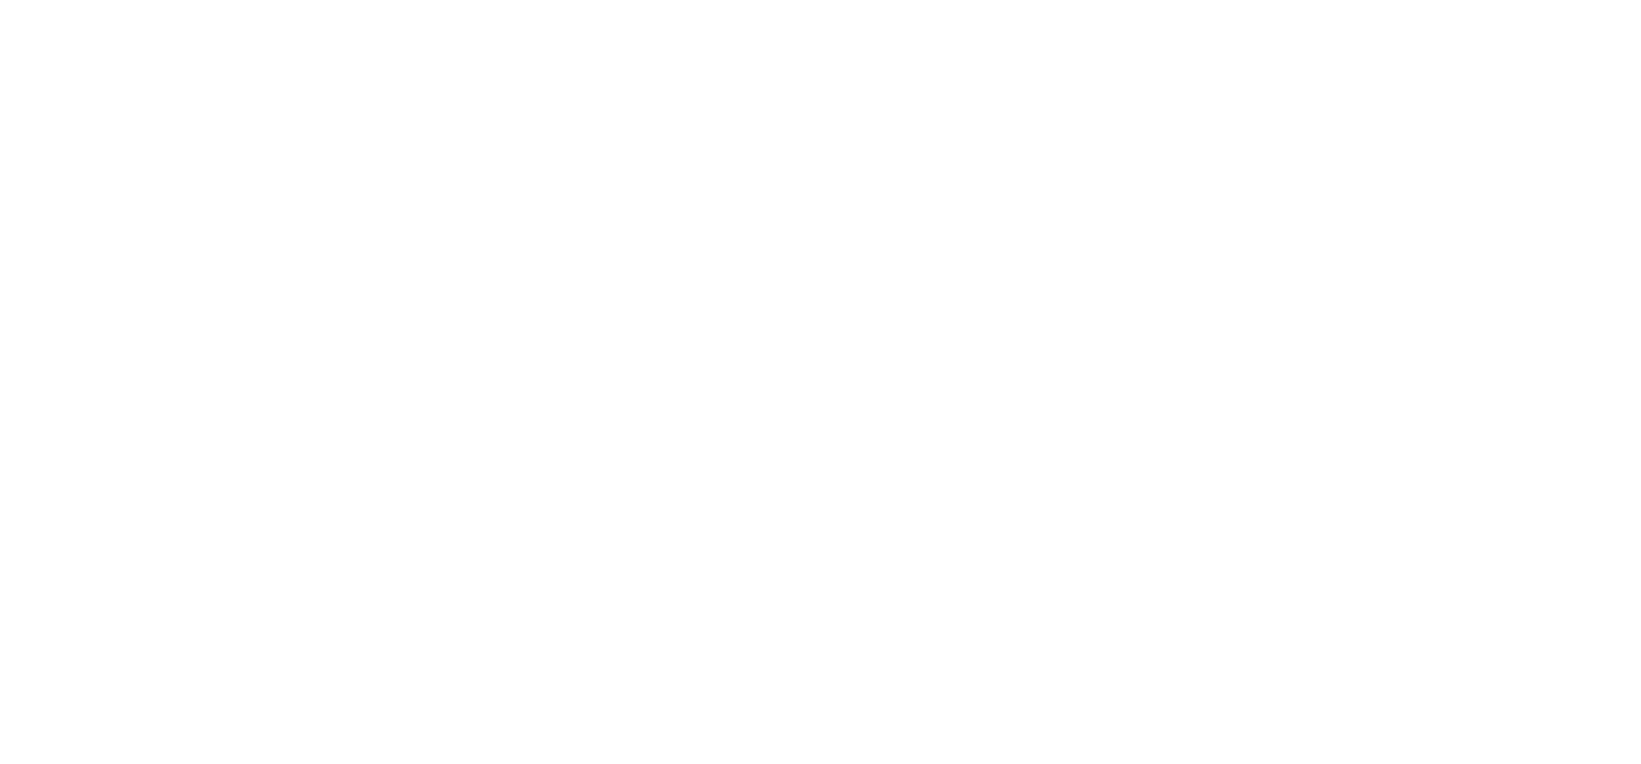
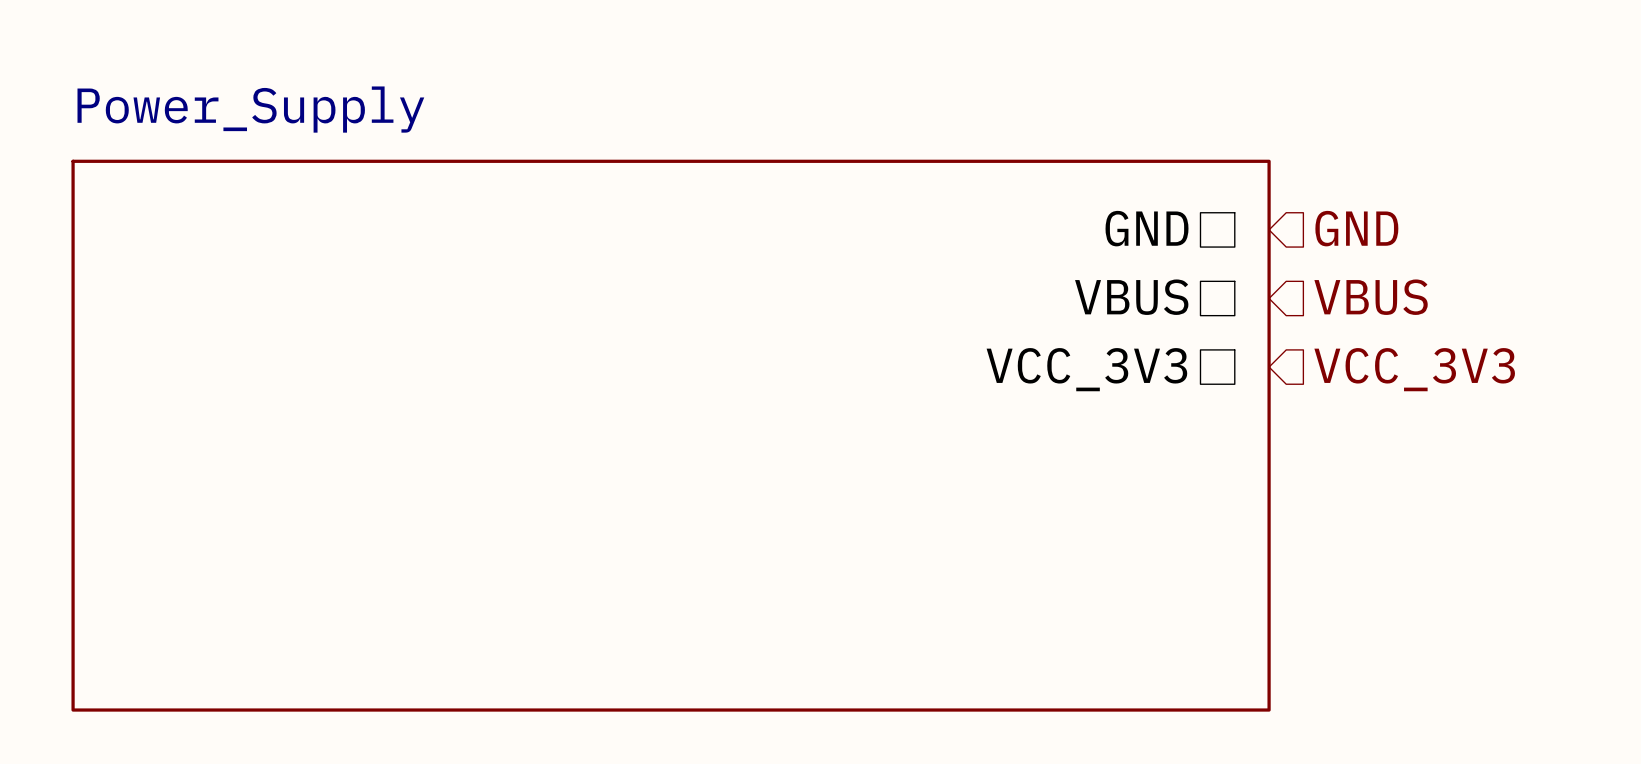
sheet pin: none -> GND (1147, 228)
hierarchical label: none -> GND (1356, 228)
sheet pin: none -> VBUS (1131, 297)
hierarchical label: none -> VBUS (1371, 297)
sheet pin: none -> VCC_3V3 (1086, 369)
hierarchical label: none -> VCC_3V3 (1414, 369)
sheet Power_Supply: none -> (671, 435)

